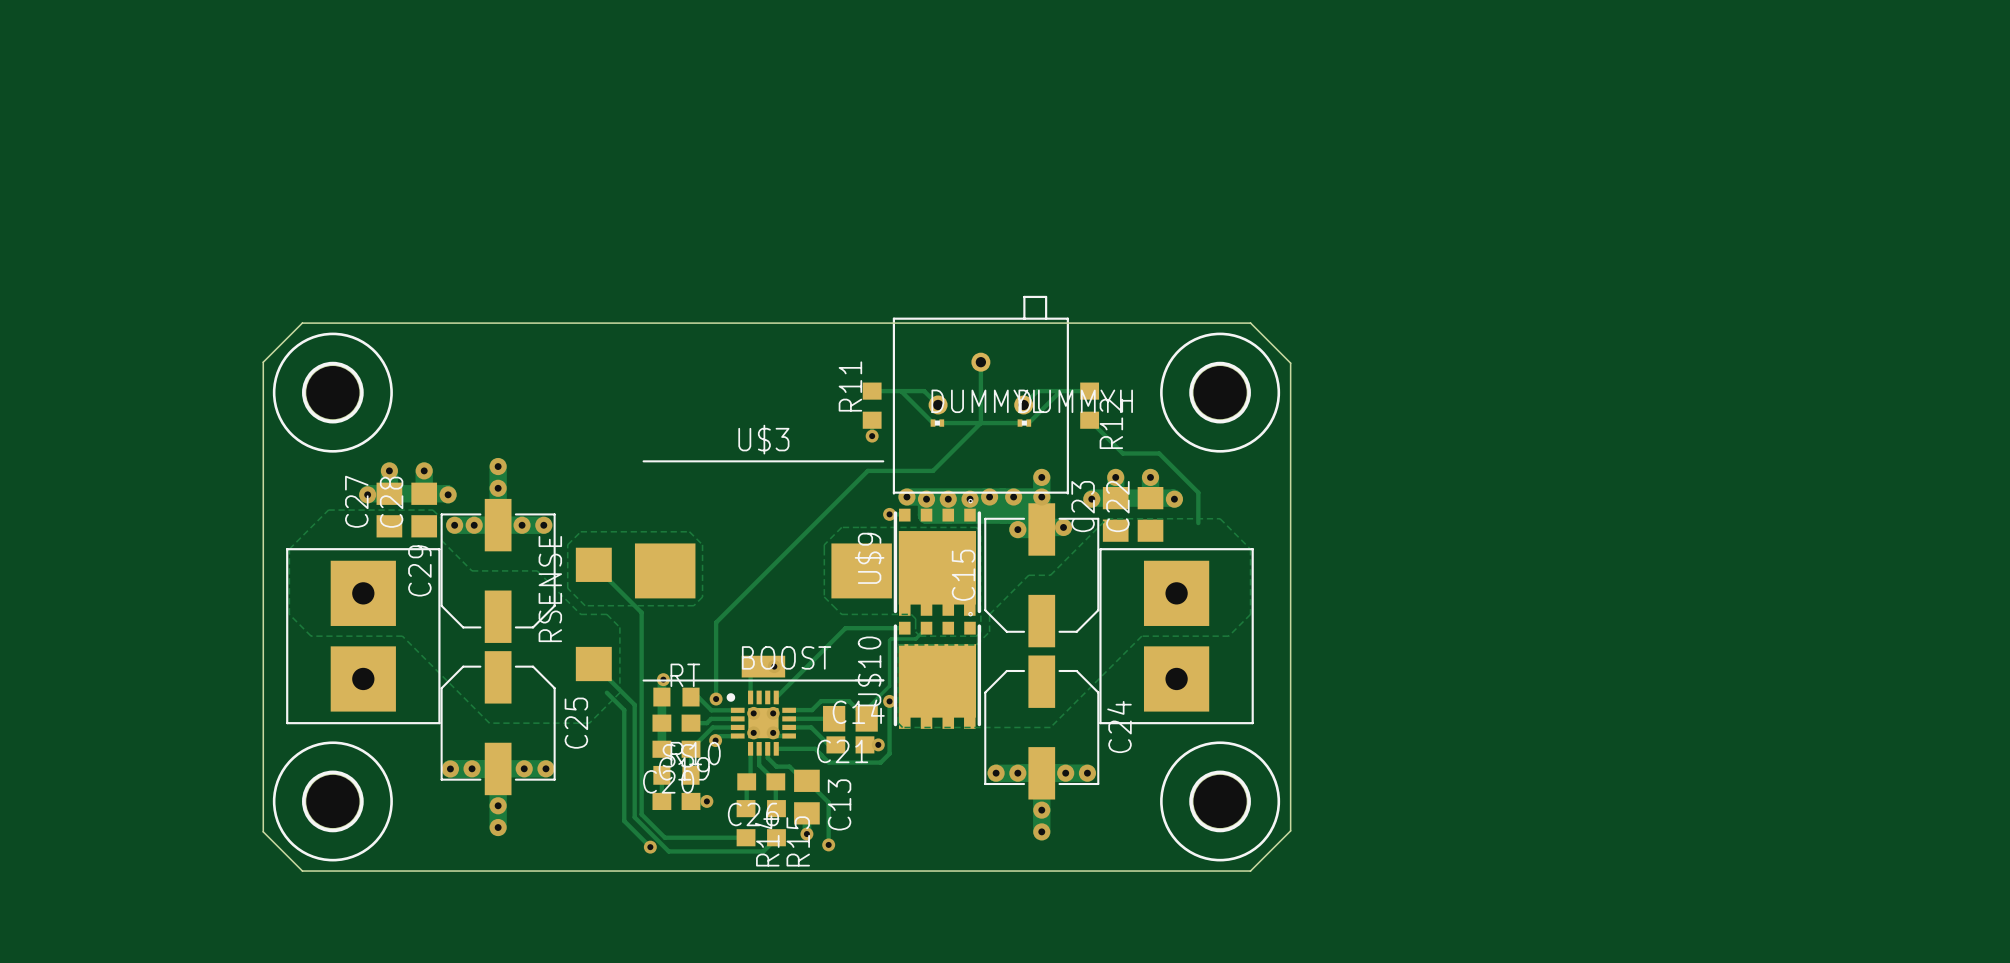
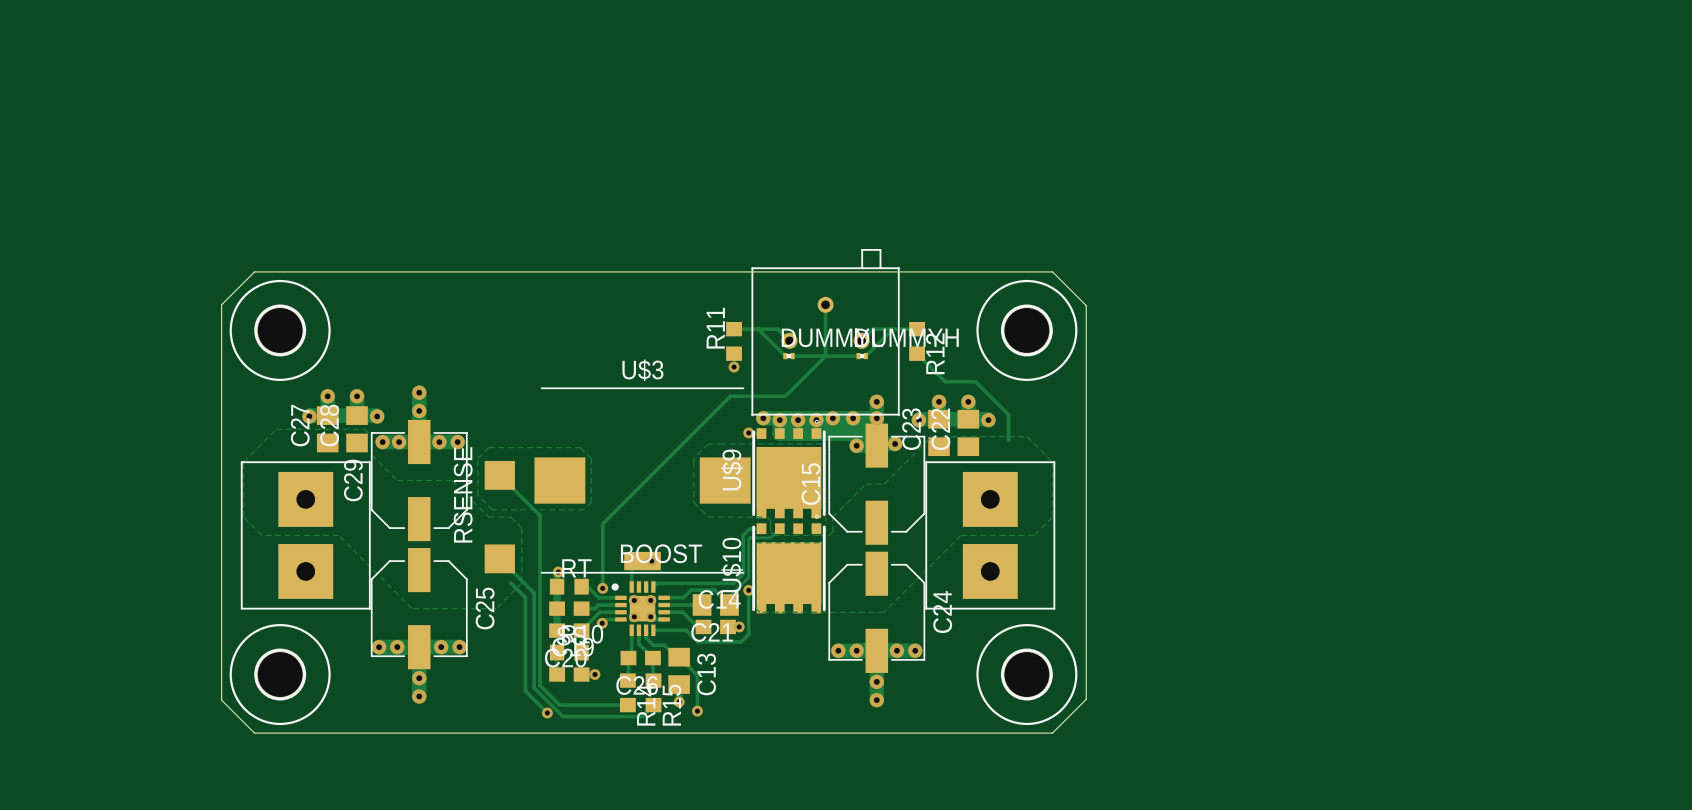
track: (891, 628) (845, 628) (780, 693) -> (749, 528) (743, 535) (743, 573) (733, 583) (657, 583)

